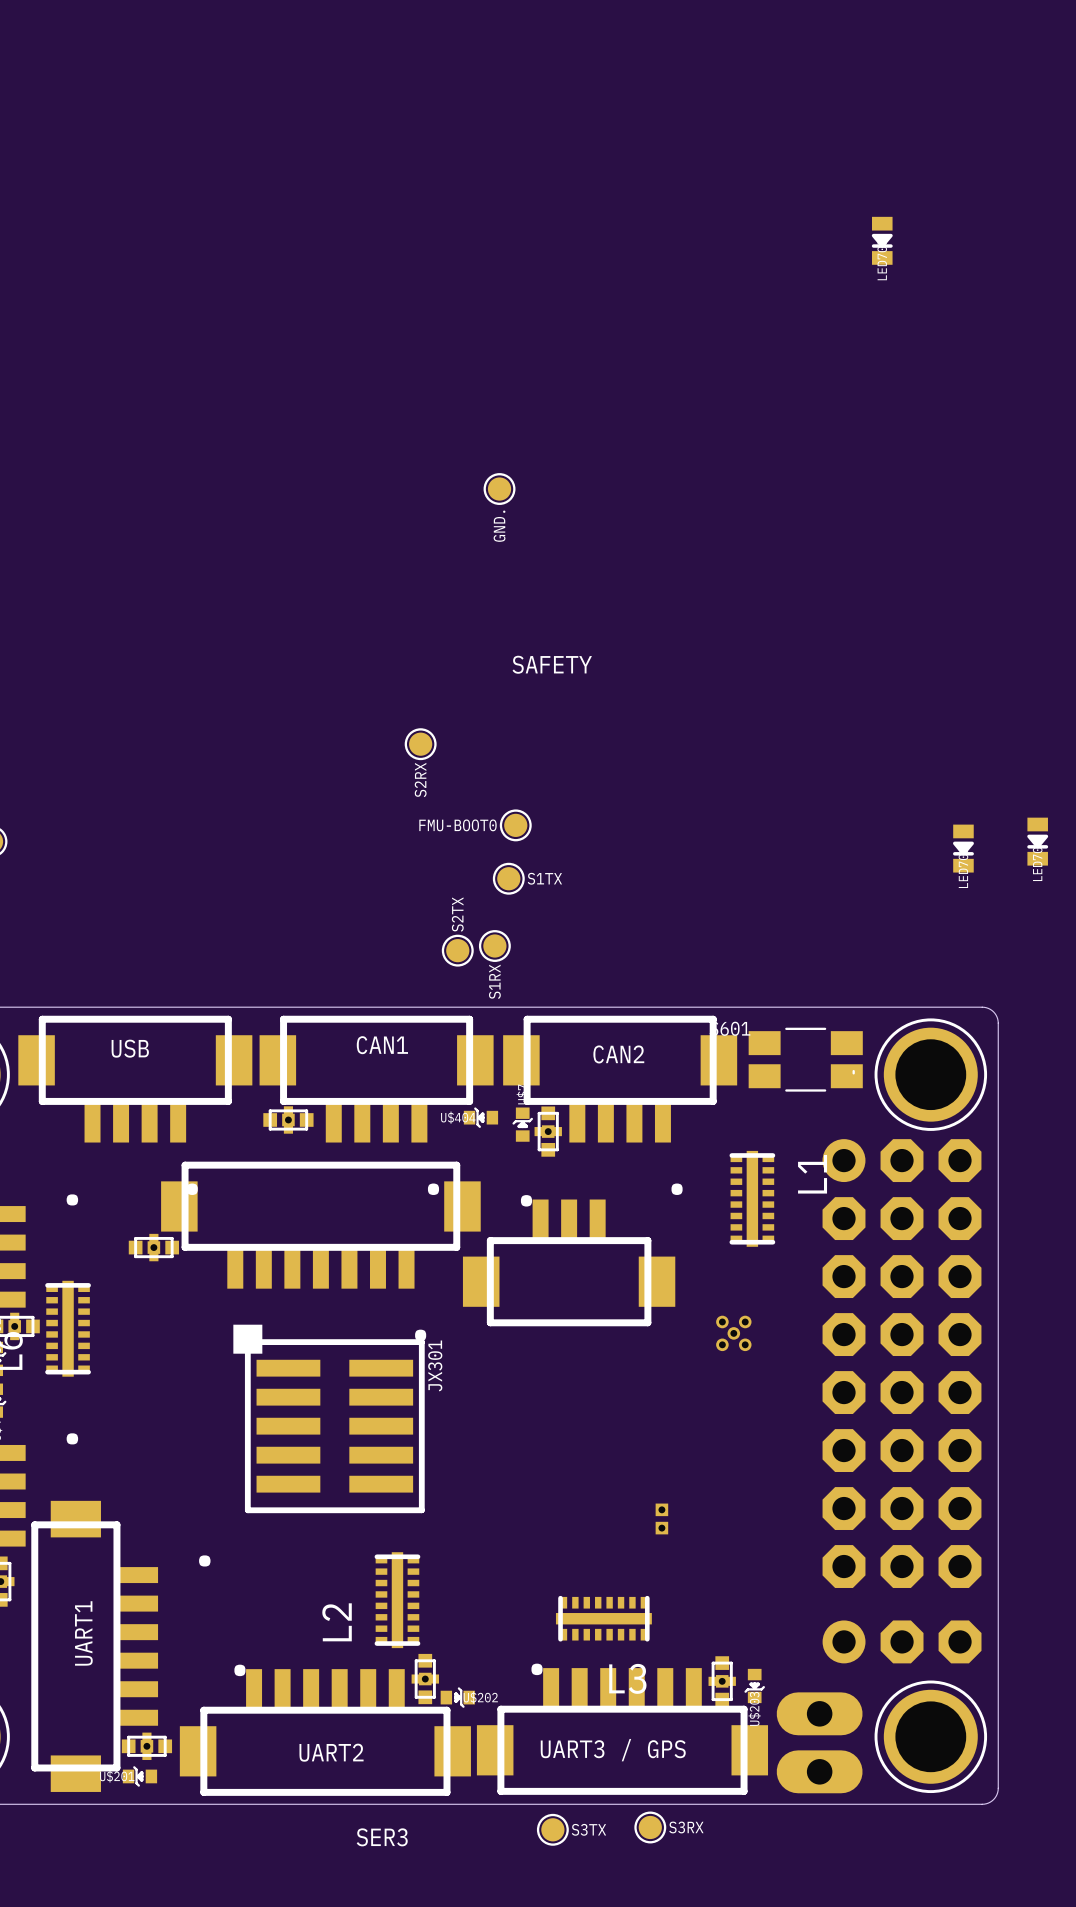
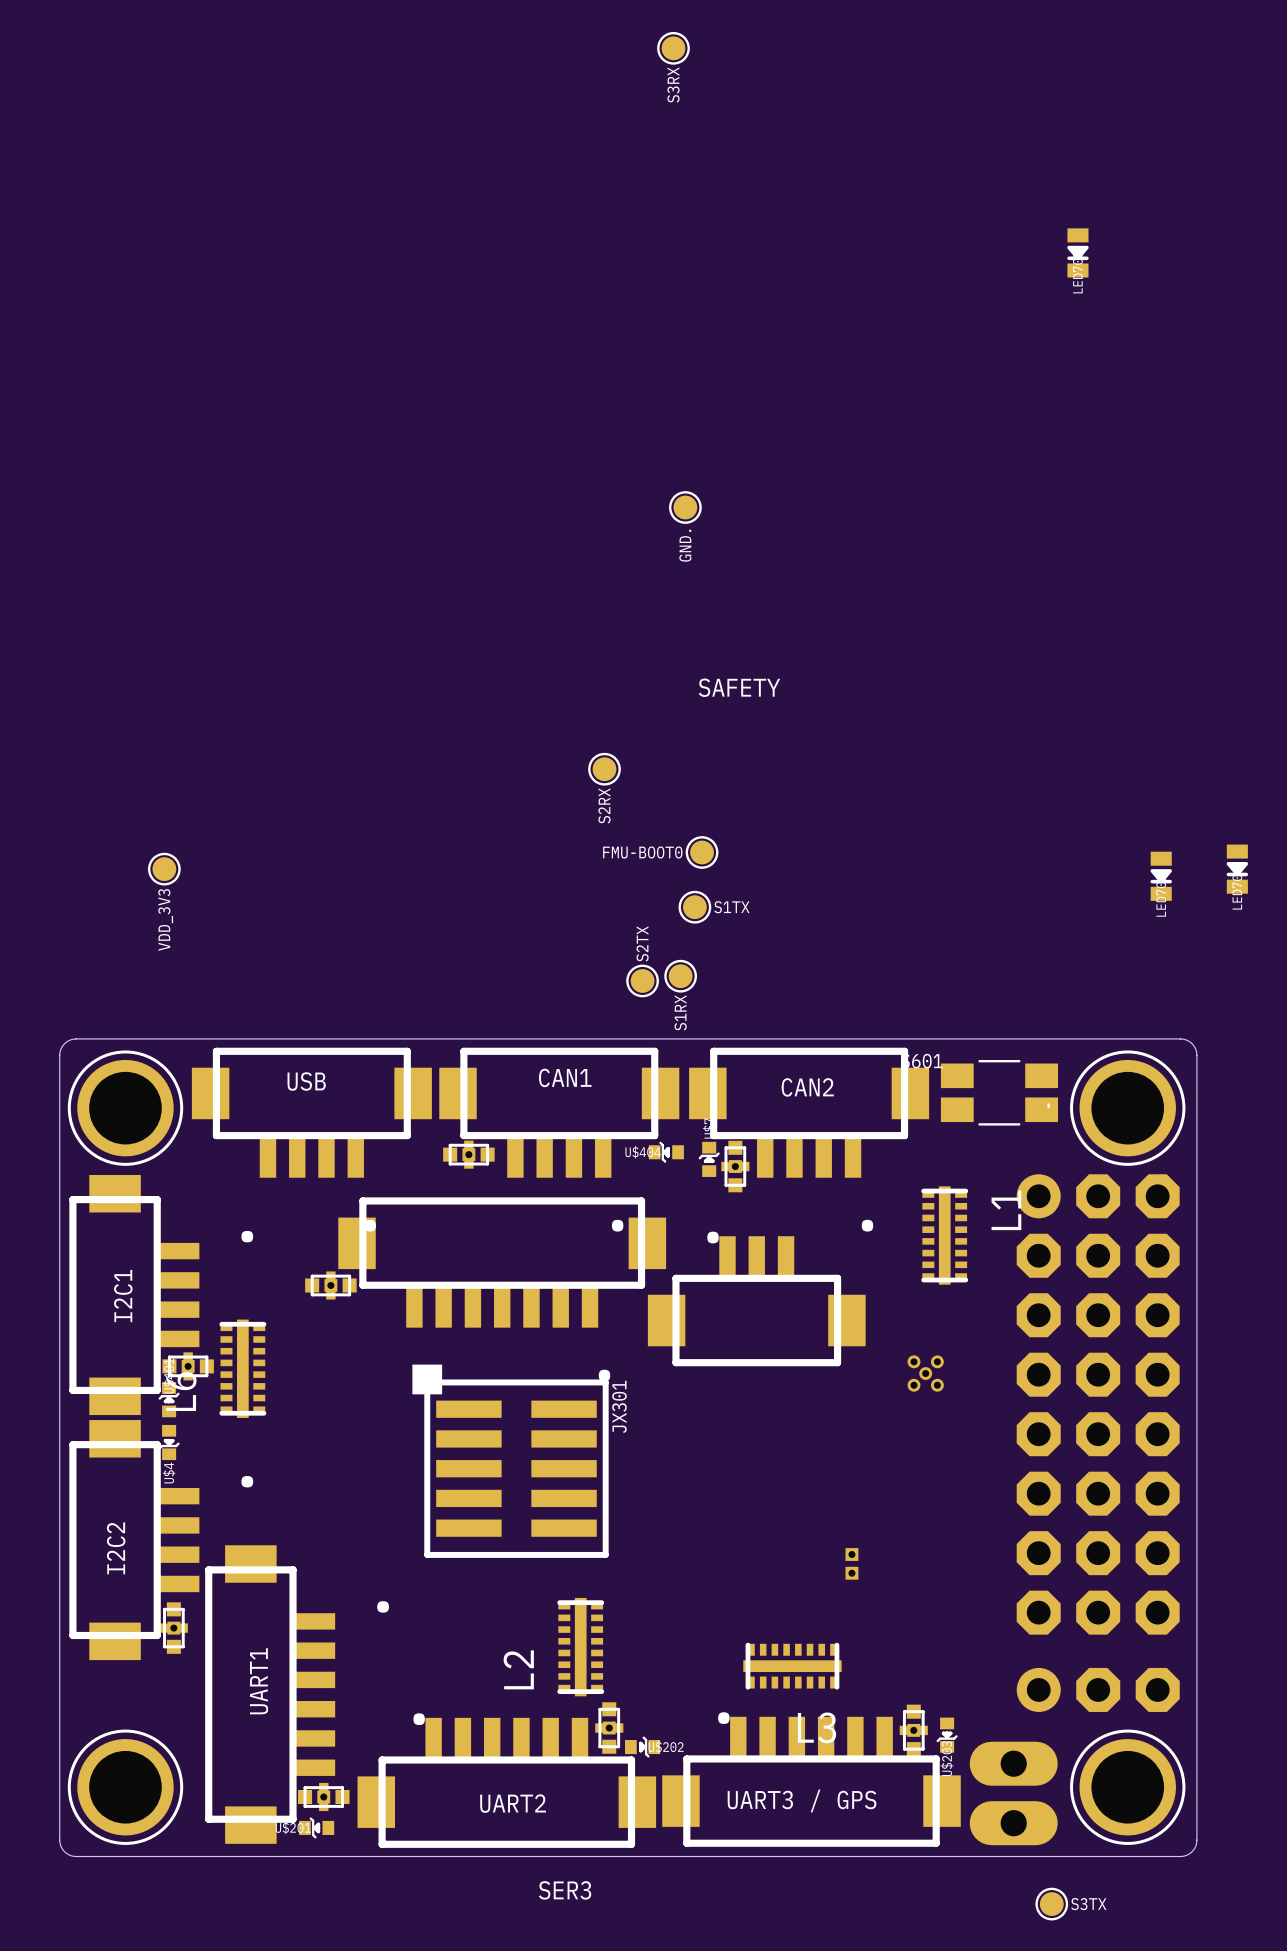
S3RX position: (650, 1827) -> (673, 48)
S3RX name rotation: 0° (686, 1827) -> 90° counterclockwise (673, 85)
S3RX name position: S3RX (686, 1827) -> S3RX (673, 85)
S3TX position: (552, 1829) -> (1051, 1904)

